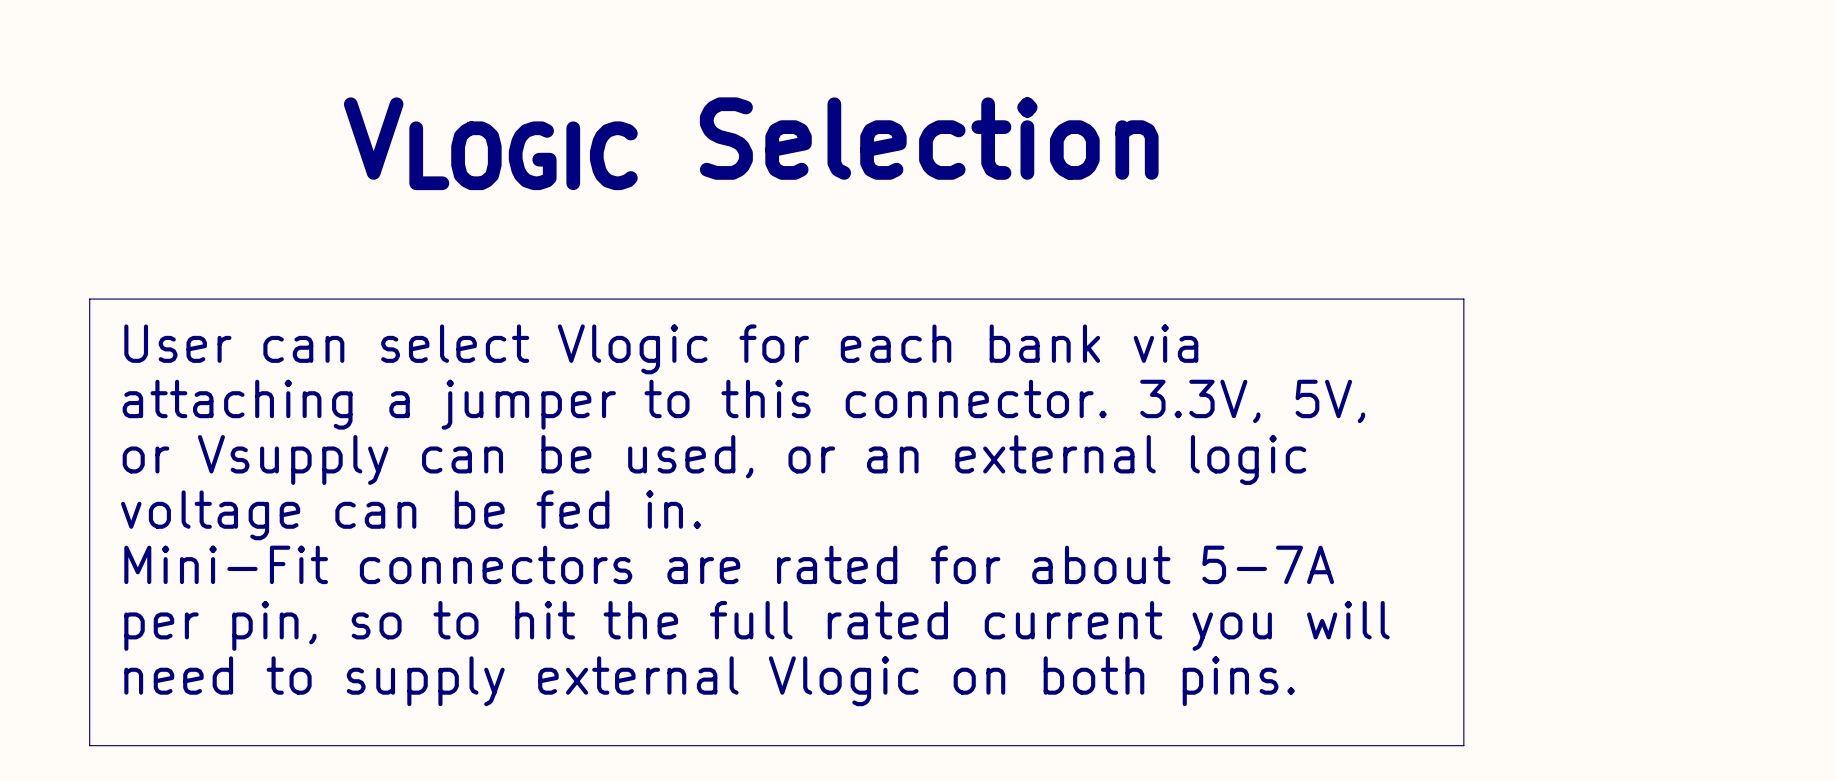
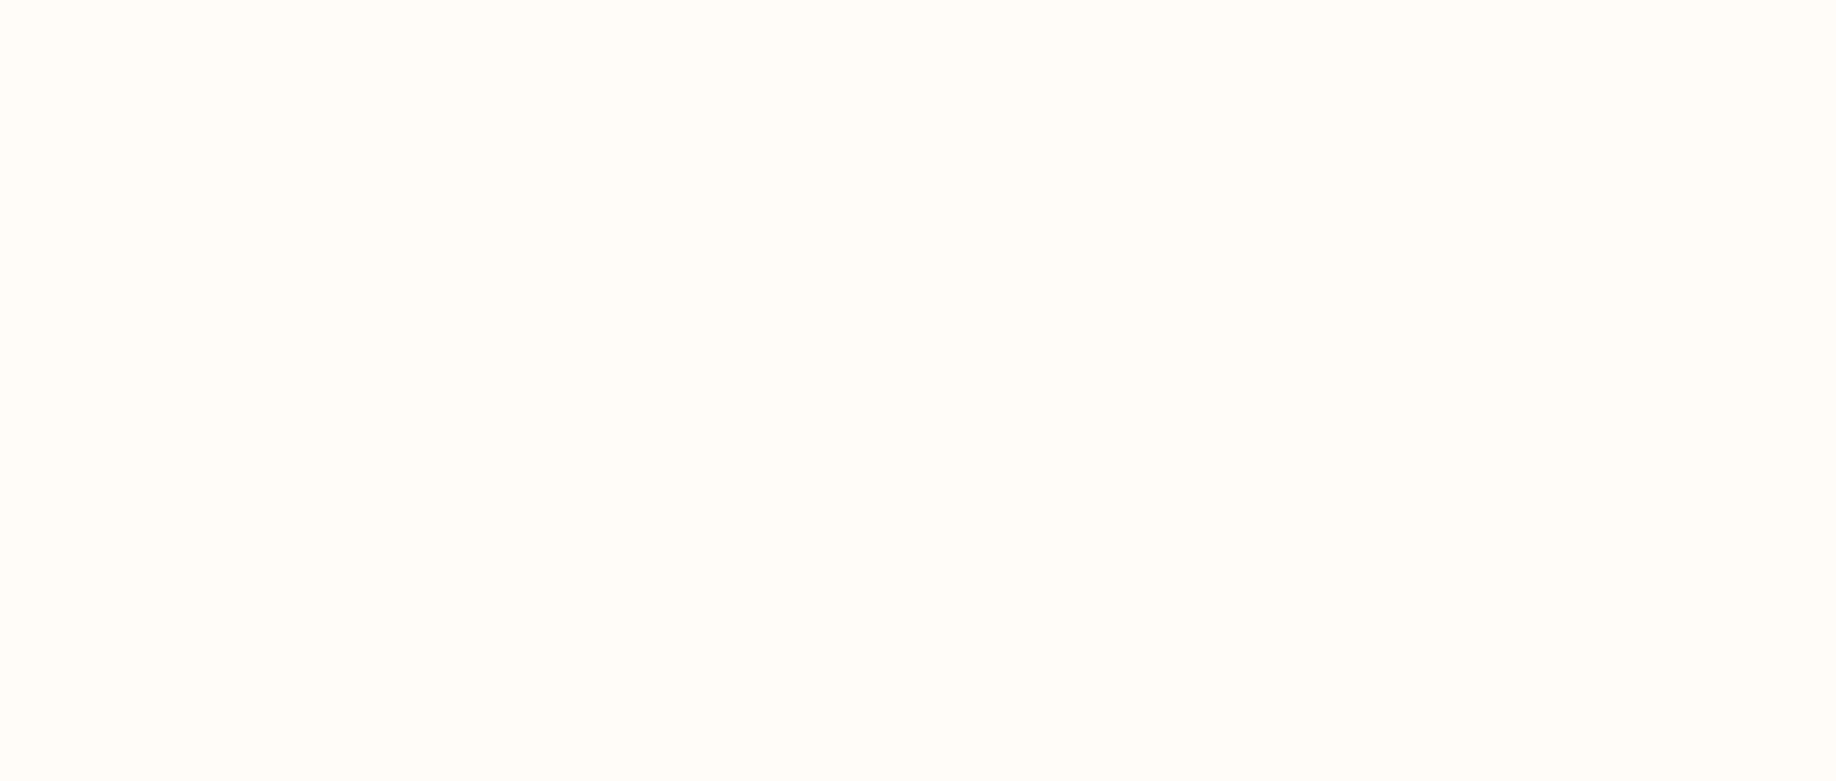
text: VLOGIC Selection (751, 143) -> none
line: (89, 299) (1463, 299) (1463, 745) (89, 745) (89, 299) -> none
text: User can select Vlogic for each bank via (661, 349) -> none
text: attaching a jumper to this connector. 3.3V, 5V, (743, 404) -> none
text: or Vsupply can be used, or an external logic (714, 459) -> none
text: voltage can be fed in. (411, 515) -> none
text: Mini-Fit connectors are rated for about 5-7A (729, 564) -> none
text: per pin, so to hit the full rated current you will (756, 625) -> none
text: need to supply external Vlogic on both pins. (709, 681) -> none

